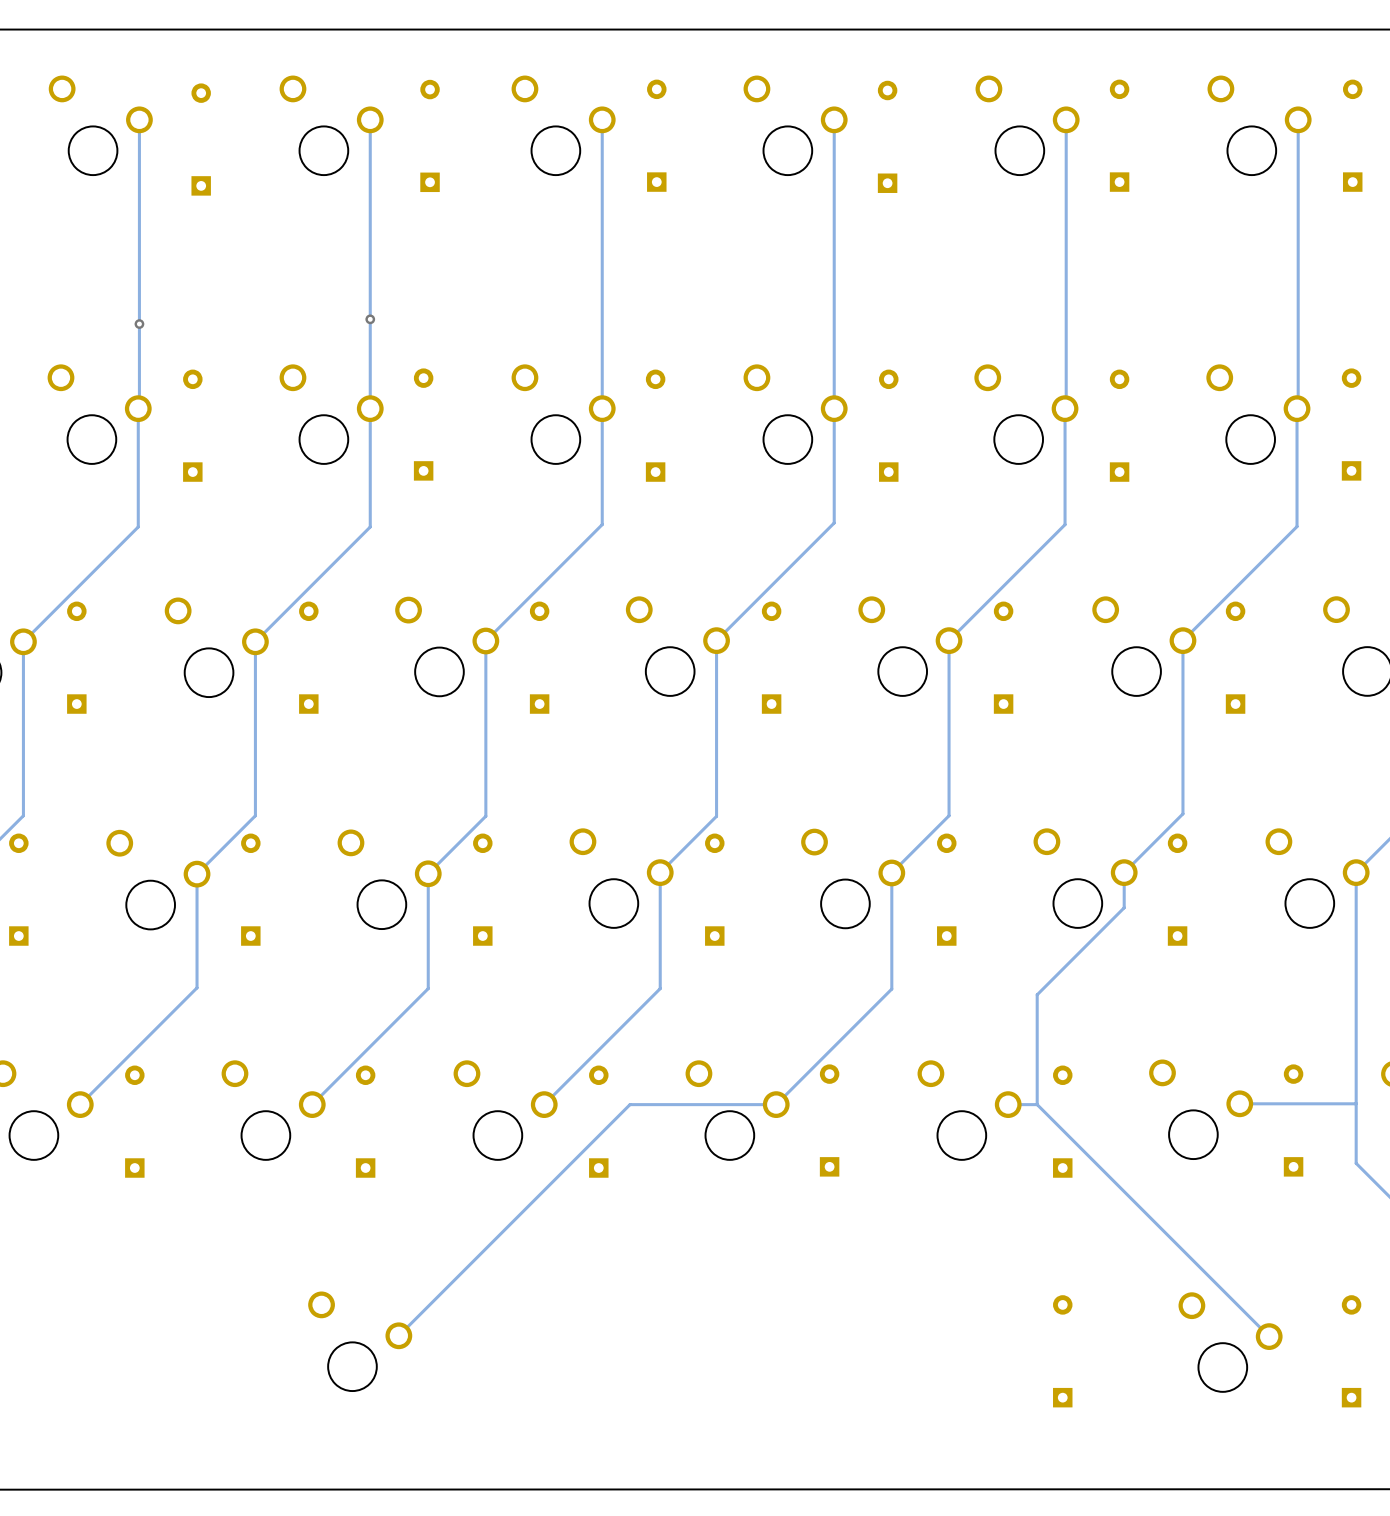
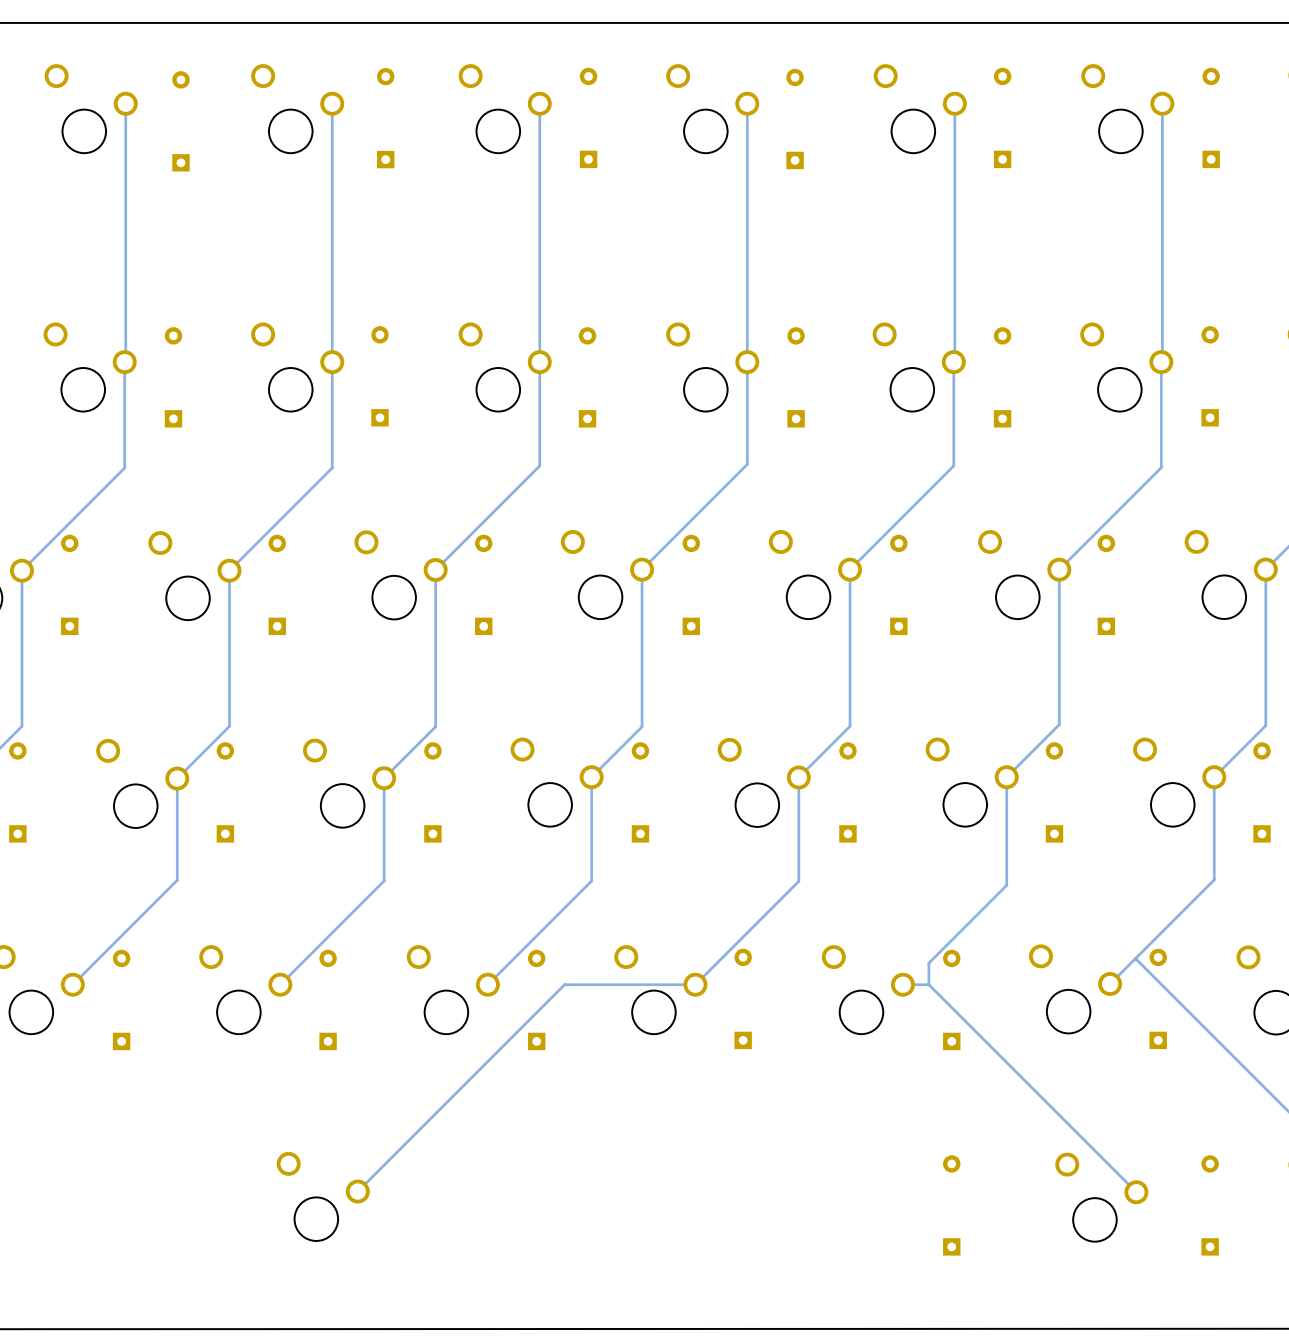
via: (370, 319) -> none
via: (139, 324) -> none
track: (1124, 907) (1037, 994) (1037, 1080) -> (1006, 808) (1006, 885) (928, 963)
track: (1356, 987) (1356, 1163) -> (1135, 958) (1214, 1037)
track: (1356, 1103) (1239, 1103) -> (1214, 879) (1110, 983)

